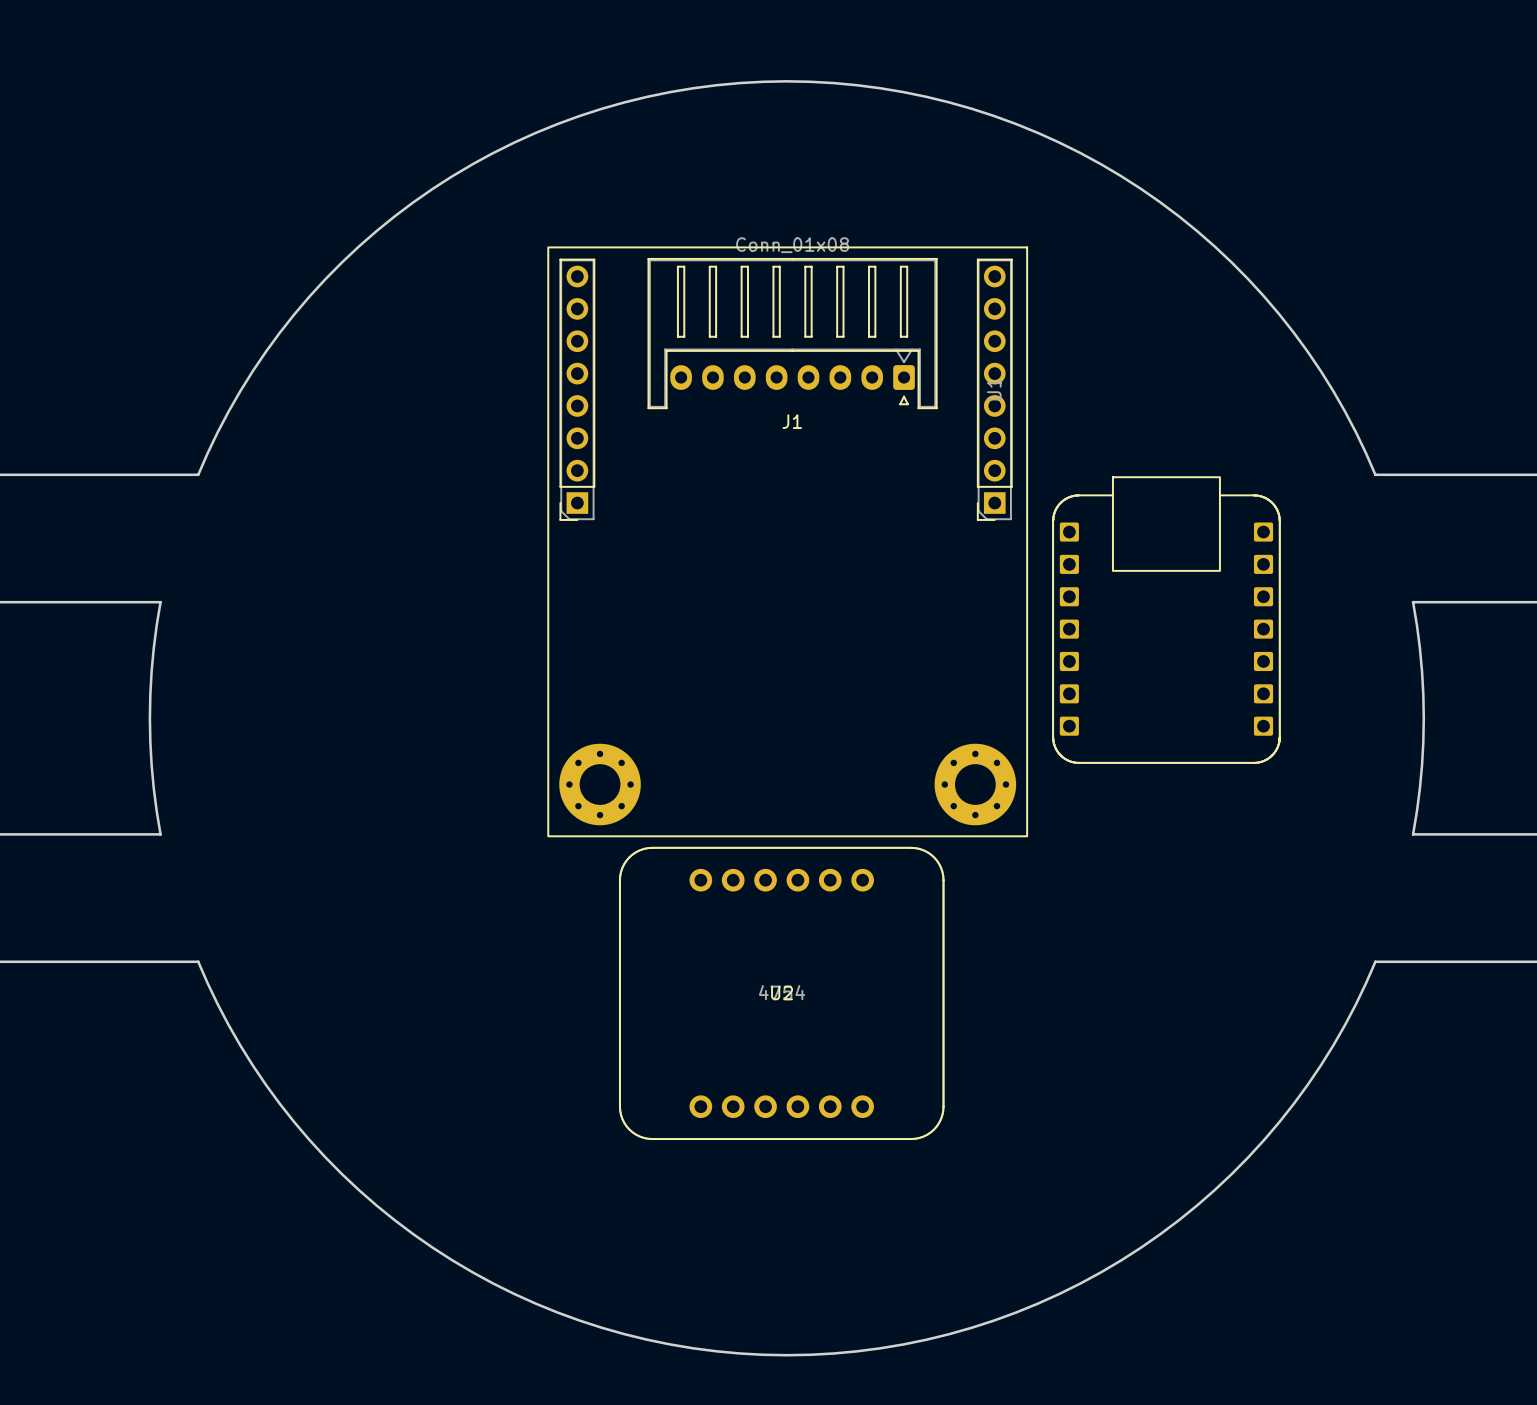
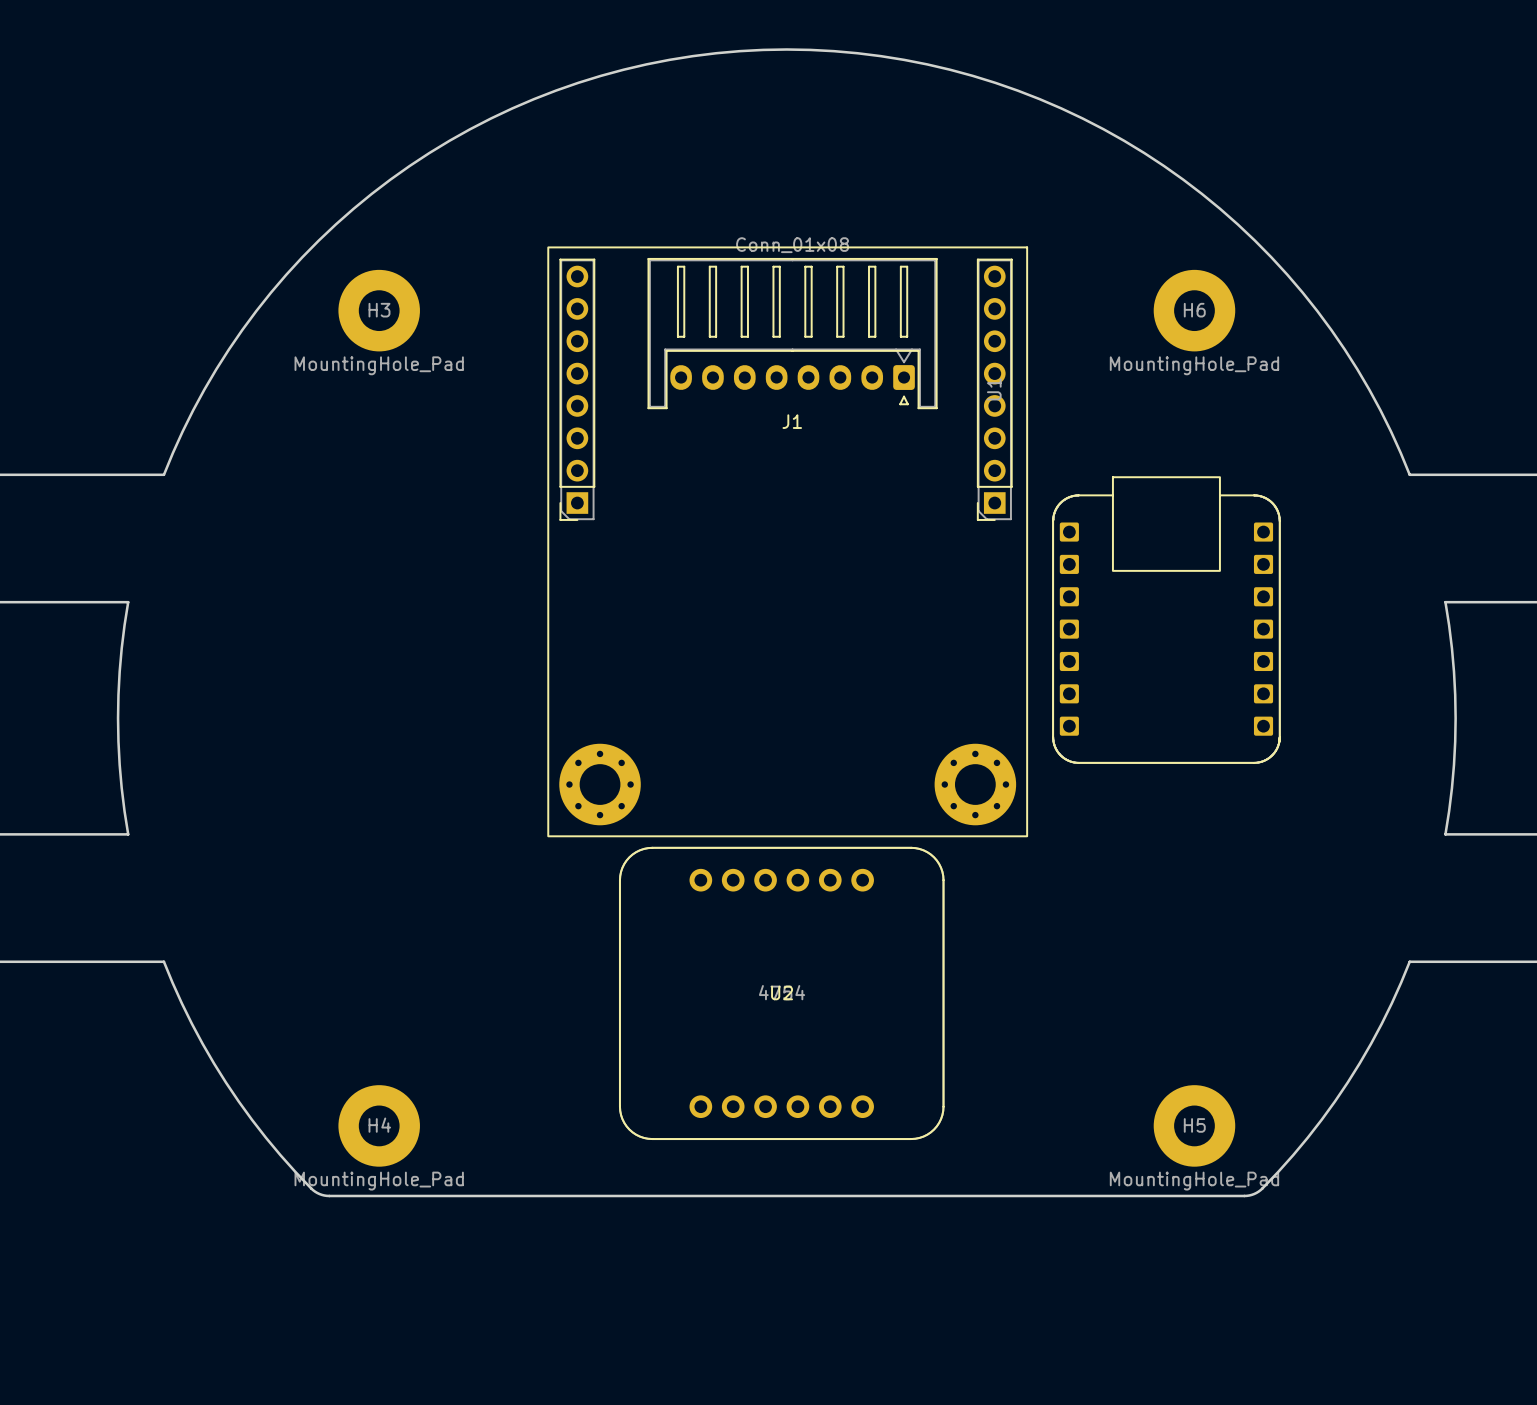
H3: none -> MountingHole_Pad (379, 310)
H6: none -> MountingHole_Pad (1194, 310)
board edge: (163, 474) (198, 474) (217, 432) (252, 371) (279, 332) (309, 296) (341, 262) (376, 231) (413, 202) (452, 176) (493, 152) (535, 132) (579, 116) (624, 102) (670, 92) (716, 85) (786, 81) (833, 83) (880, 88) (926, 96) (971, 108) (1037, 132) (1080, 152) (1121, 176) (1160, 202) (1197, 231) (1231, 262) (1264, 296) (1307, 351) (1333, 391) (1355, 432) (1375, 474) (1409, 474) -> (163, 474) (182, 431) (204, 389) (228, 349) (256, 311) (286, 274) (335, 224) (371, 193) (409, 165) (449, 140) (512, 108) (556, 90) (600, 75) (646, 64) (692, 56) (739, 51) (786, 49) (833, 51) (880, 56) (927, 64) (972, 75) (1017, 90) (1061, 108) (1103, 129) (1163, 165) (1201, 193) (1237, 224) (1271, 257) (1317, 311) (1344, 349) (1369, 389) (1391, 431) (1409, 474)
board edge: (128, 602) (160, 602) (153, 648) (149, 718) (153, 788) (160, 834) (128, 834) -> (128, 602) (121, 648) (118, 718) (119, 764) (128, 834)
board edge: (1445, 602) (1413, 602) (1419, 648) (1423, 718) (1419, 788) (1413, 834) (1445, 834) -> (1445, 602) (1451, 648) (1455, 718) (1453, 764) (1445, 834)
board edge: (163, 961) (198, 961) (217, 1004) (240, 1045) (279, 1103) (309, 1140) (341, 1174) (376, 1205) (413, 1234) (452, 1260) (514, 1294) (557, 1312) (601, 1327) (647, 1339) (693, 1348) (739, 1353) (786, 1355) (833, 1353) (880, 1348) (949, 1334) (994, 1320) (1037, 1303) (1080, 1283) (1121, 1260) (1160, 1234) (1214, 1190) (1248, 1157) (1279, 1122) (1307, 1084) (1333, 1045) (1355, 1004) (1375, 961) (1409, 961) -> (163, 961) (191, 1023) (213, 1063) (238, 1101) (265, 1137) (311, 1188) (319, 1194) (329, 1195) (1249, 1195) (1260, 1190) (1278, 1172) (1307, 1137) (1334, 1101) (1371, 1043) (1391, 1003) (1409, 961)
H4: none -> MountingHole_Pad (379, 1125)
H5: none -> MountingHole_Pad (1194, 1125)

